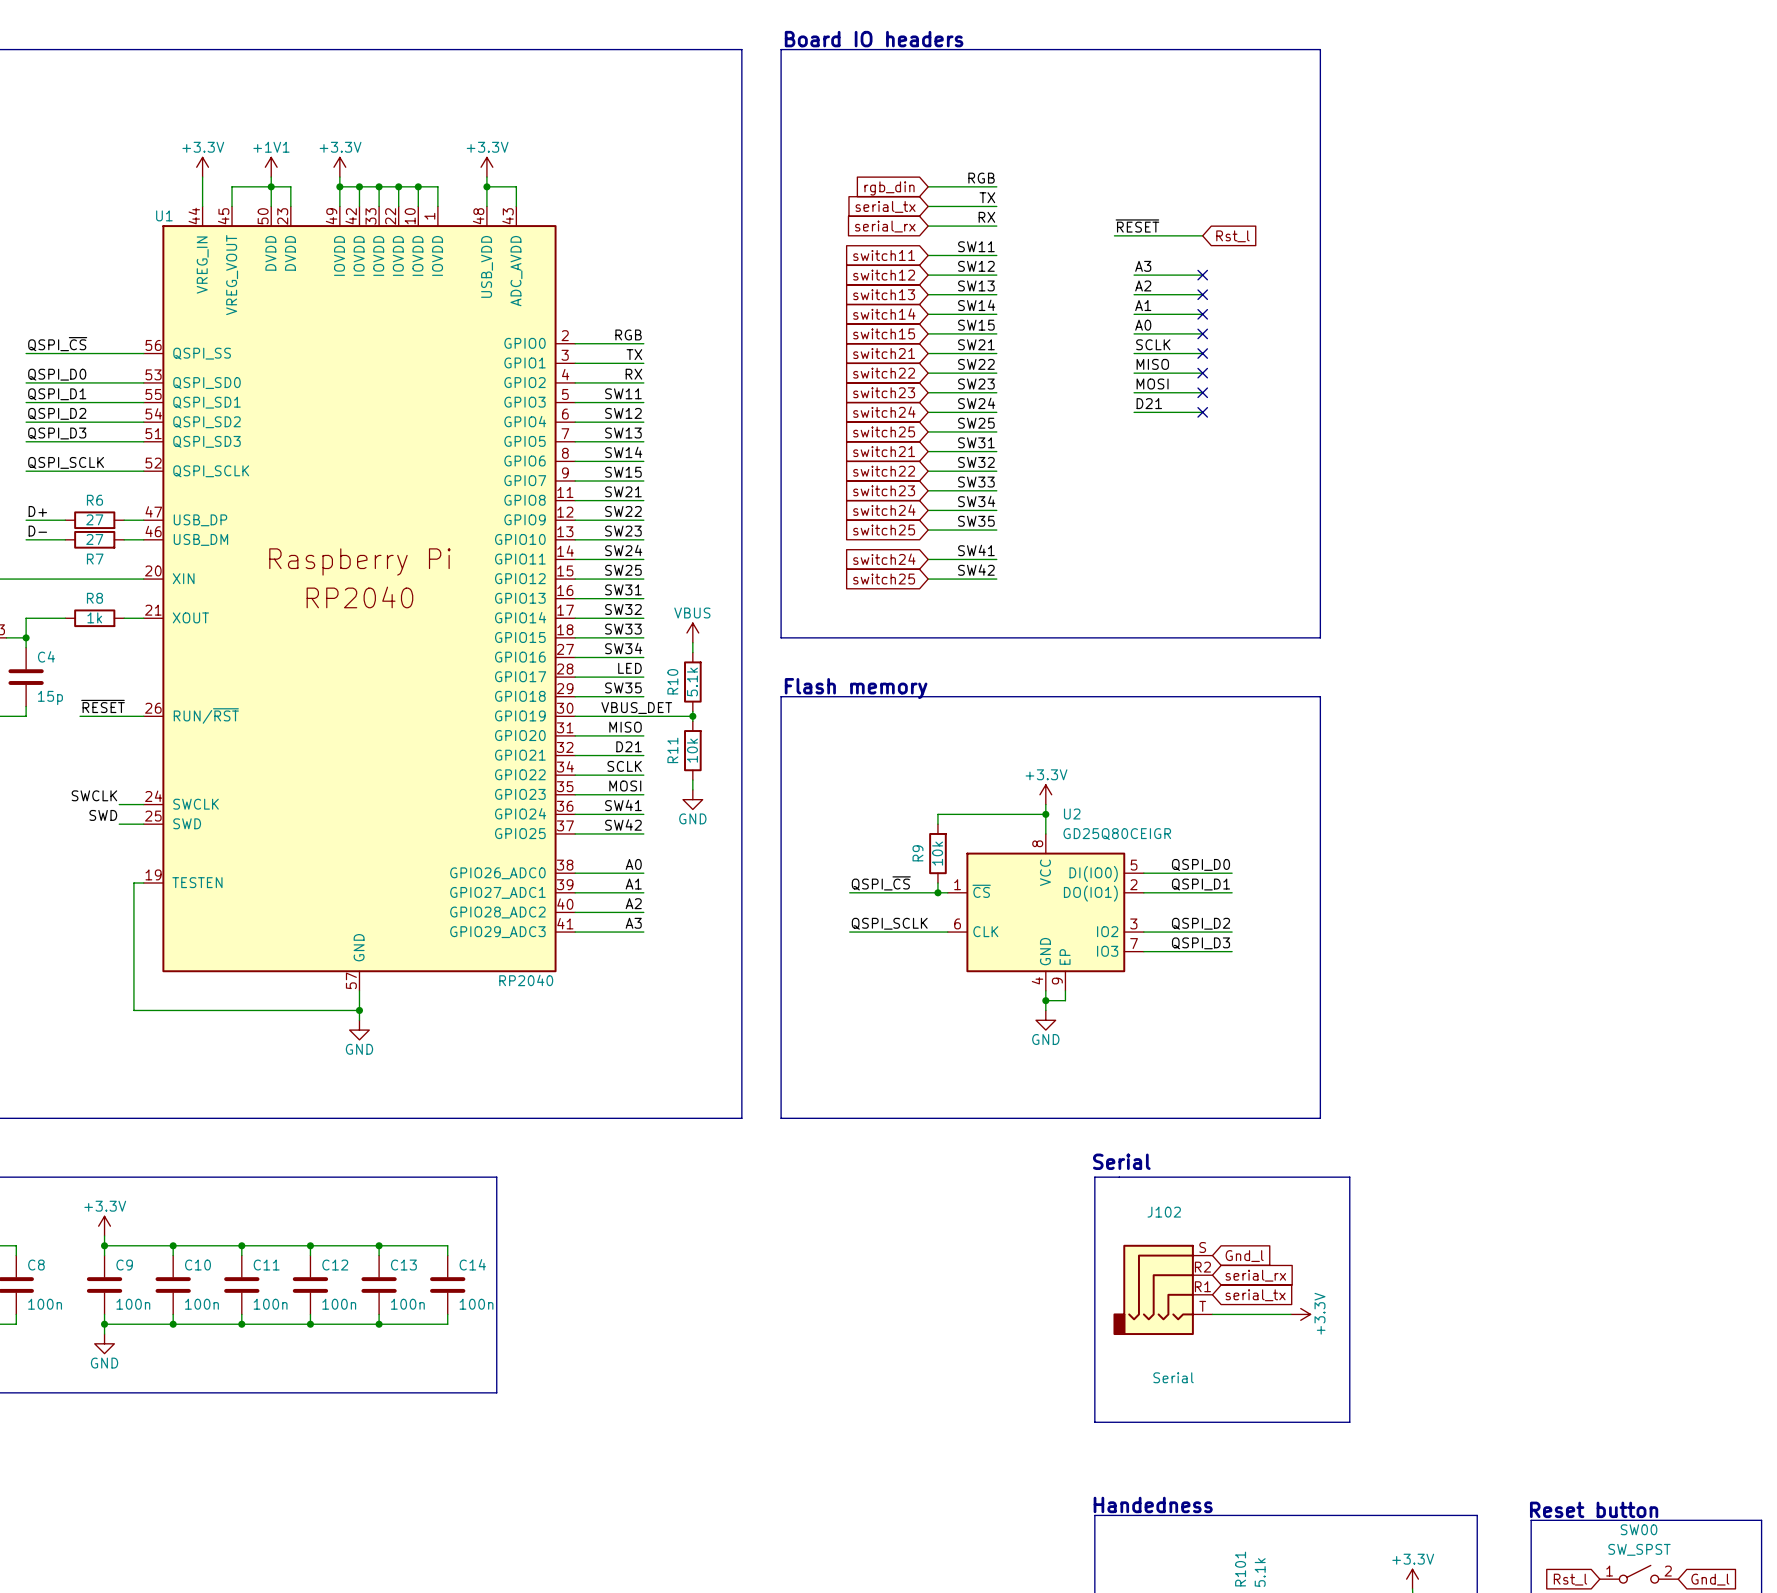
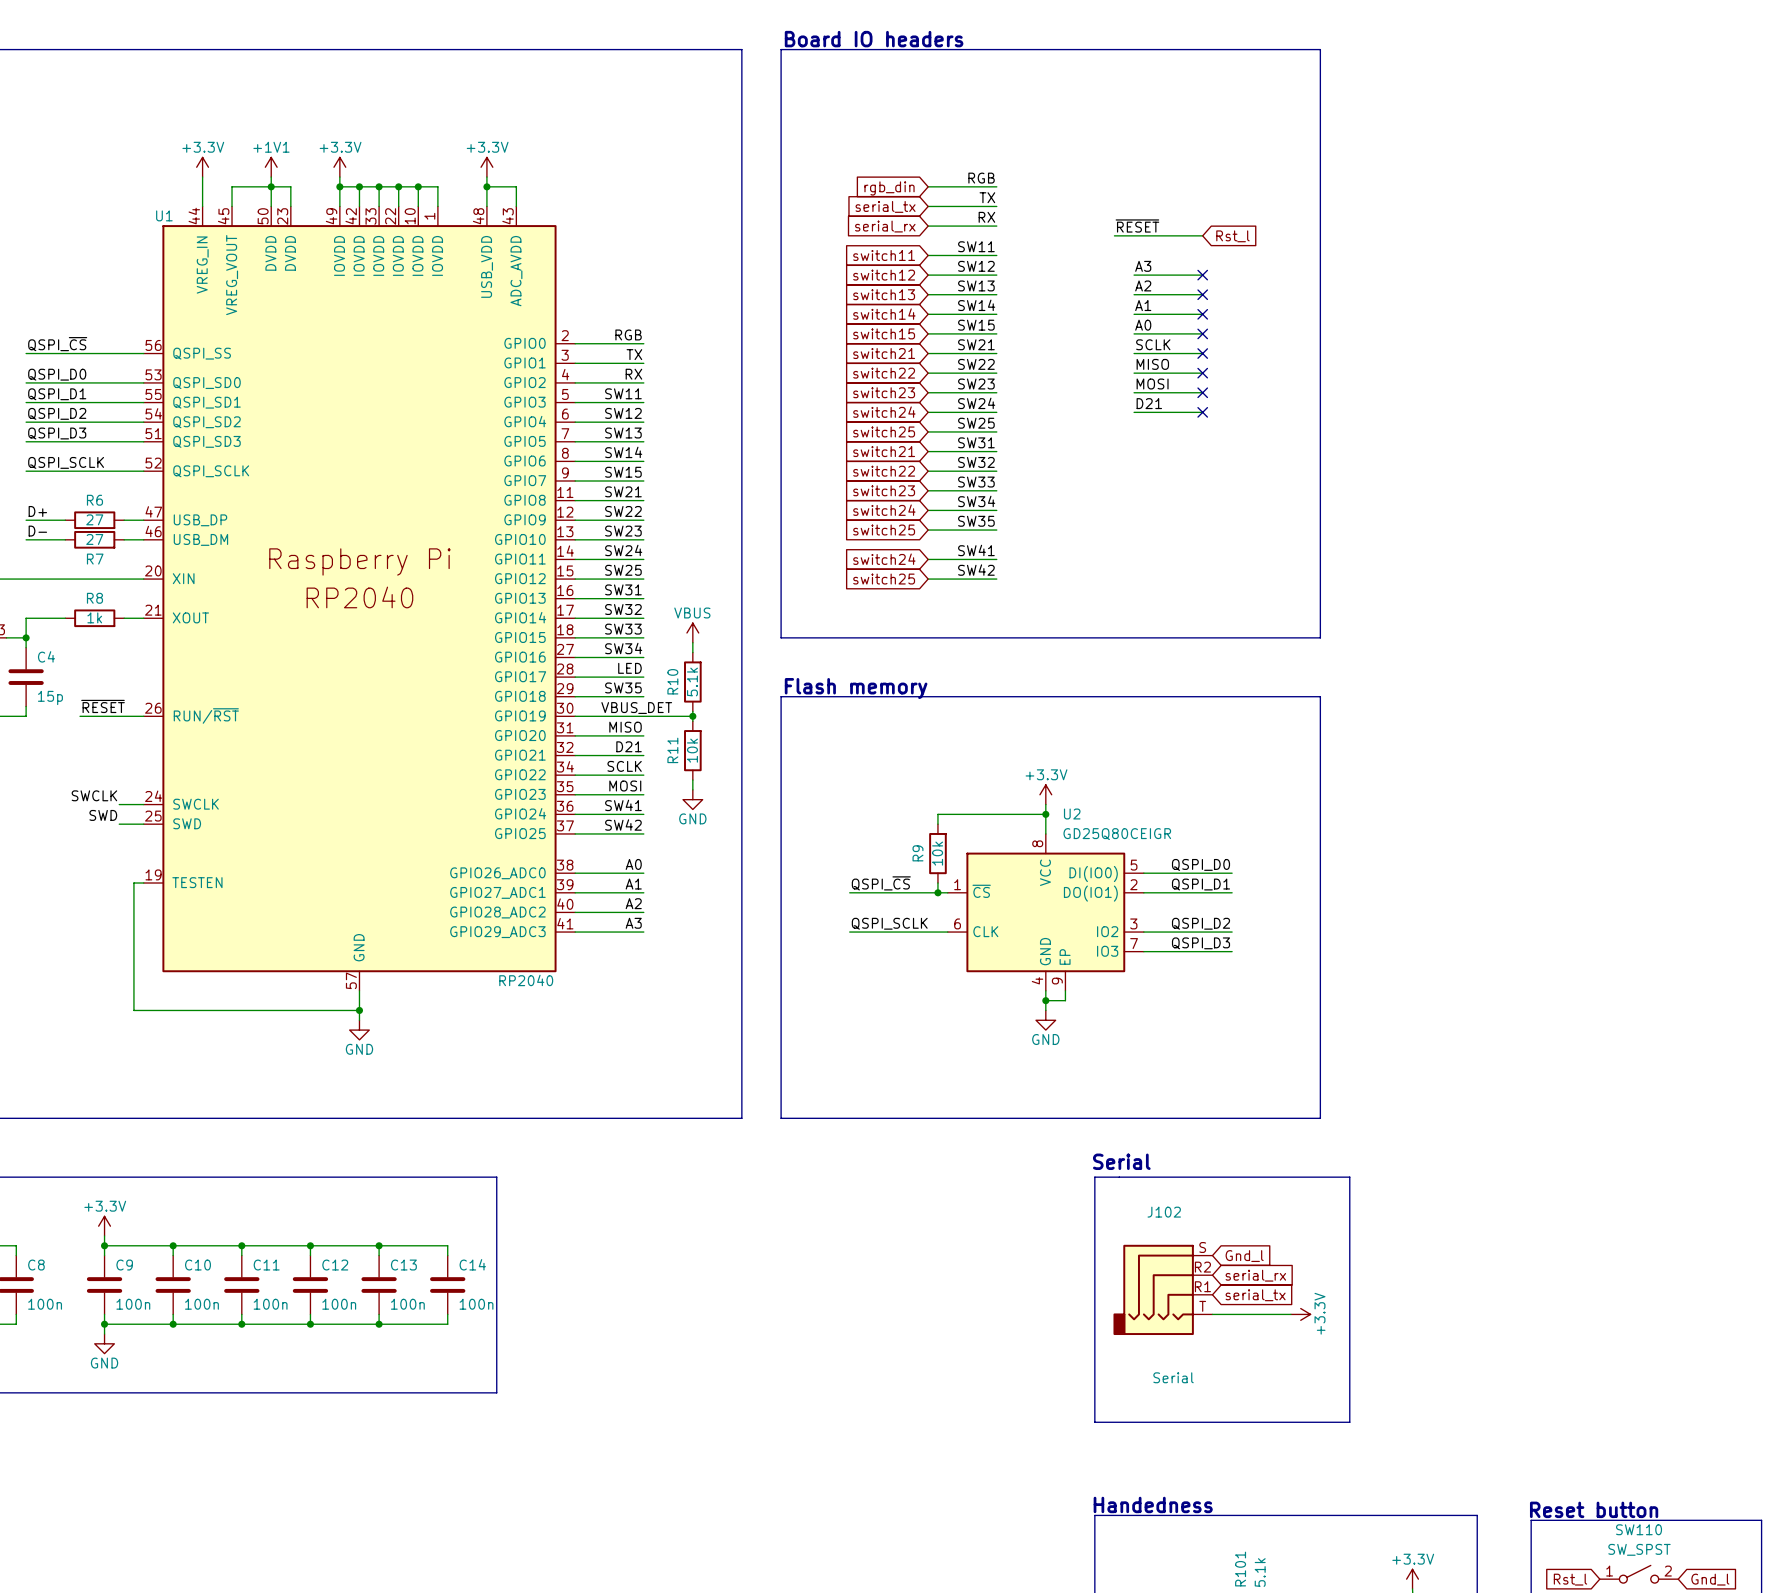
SW00 name: SW00 (1639, 1529) -> SW110 (1639, 1529)

